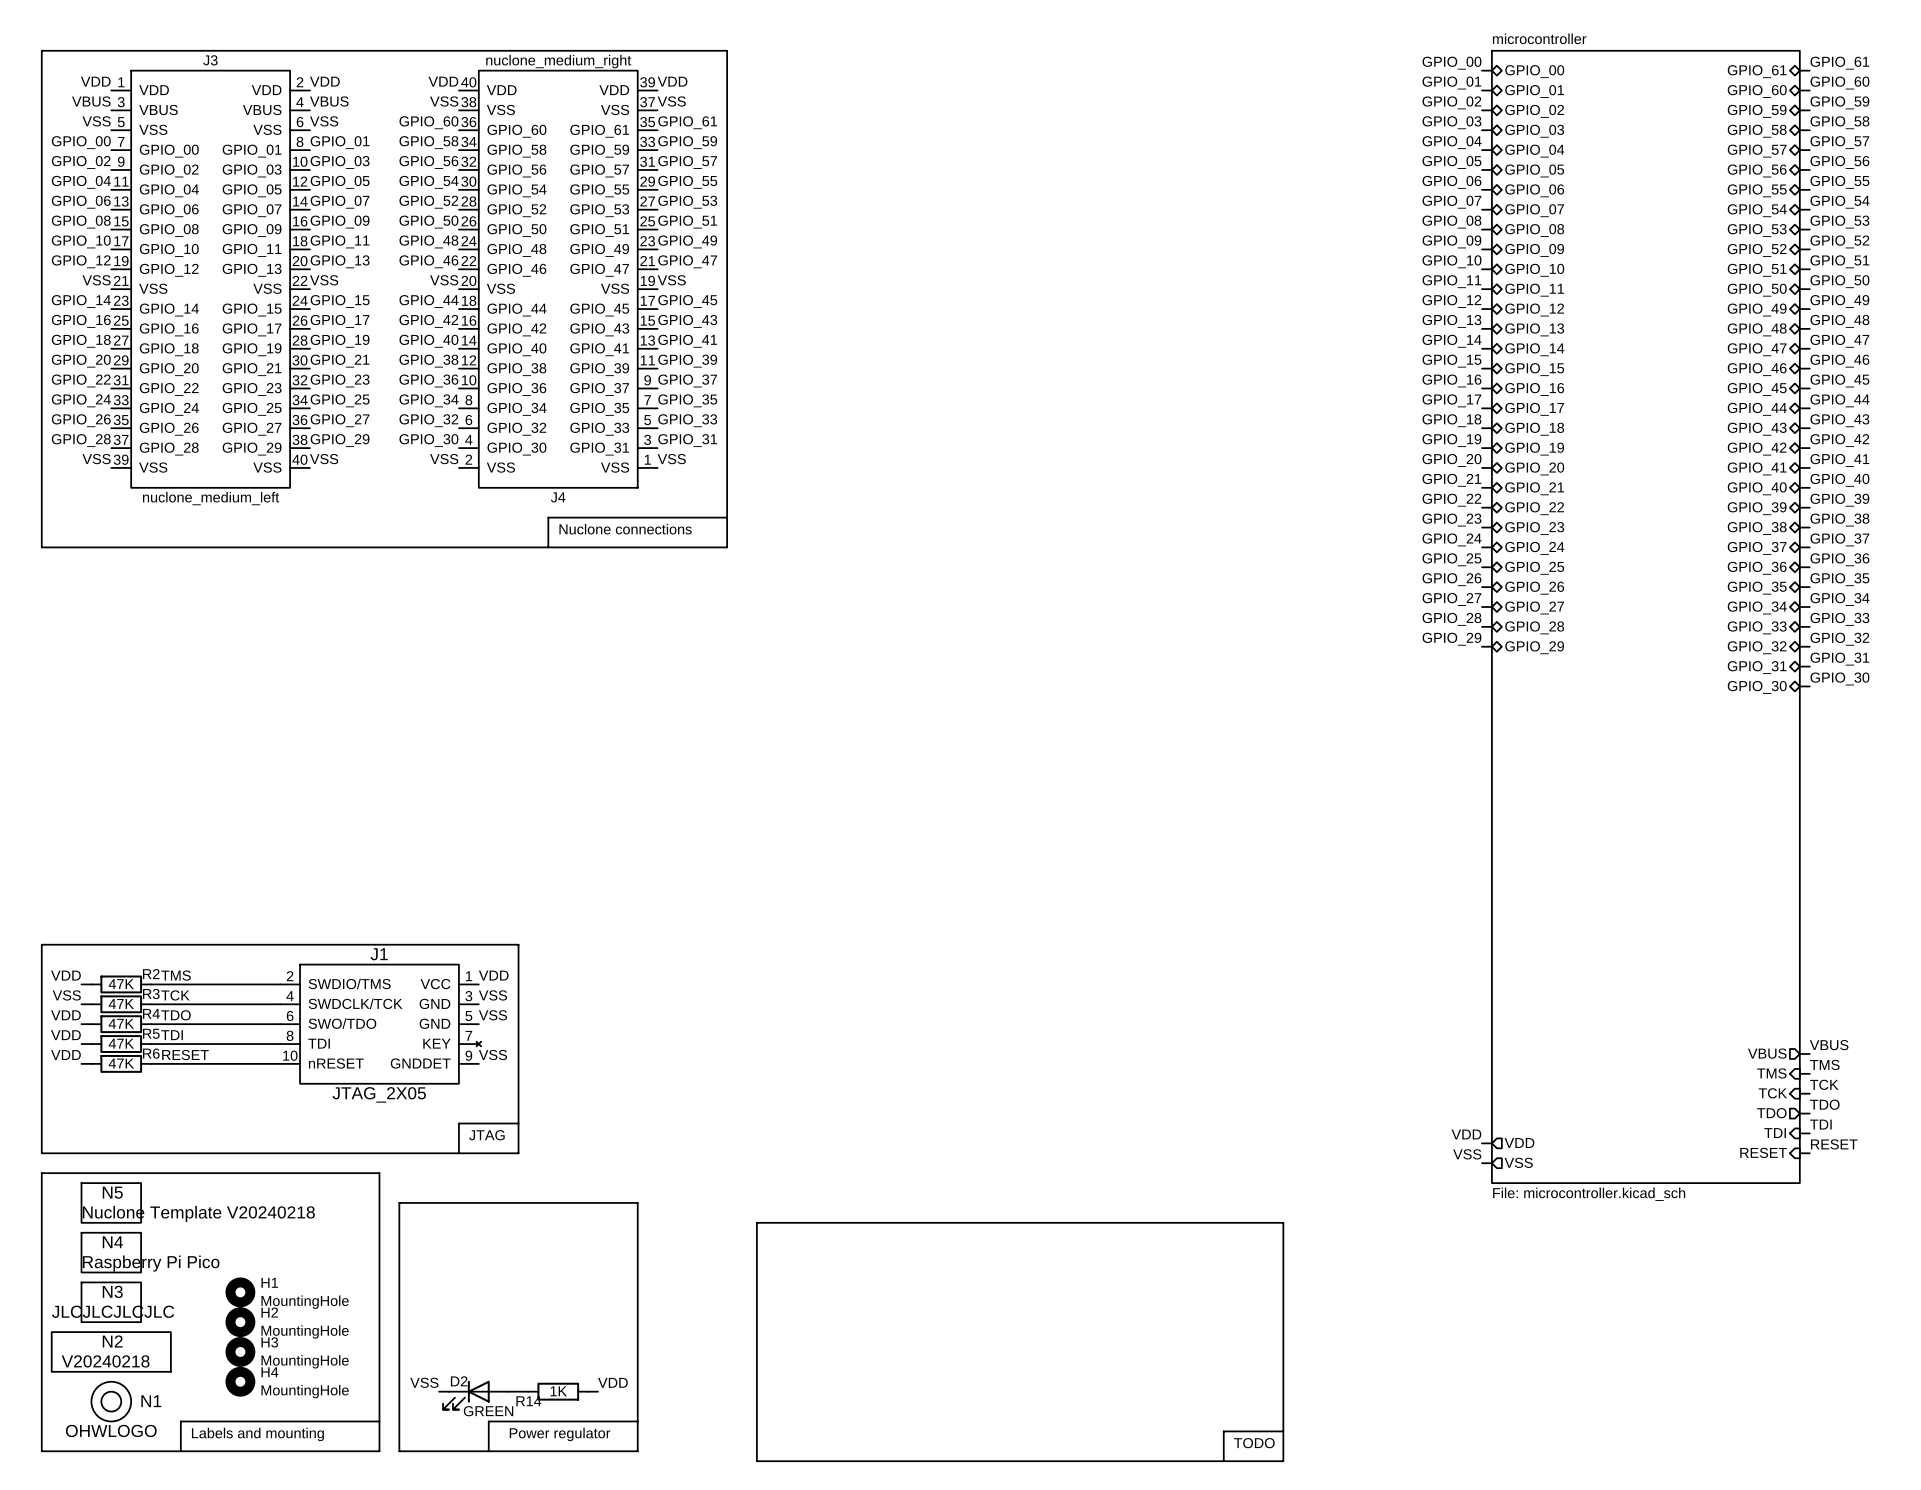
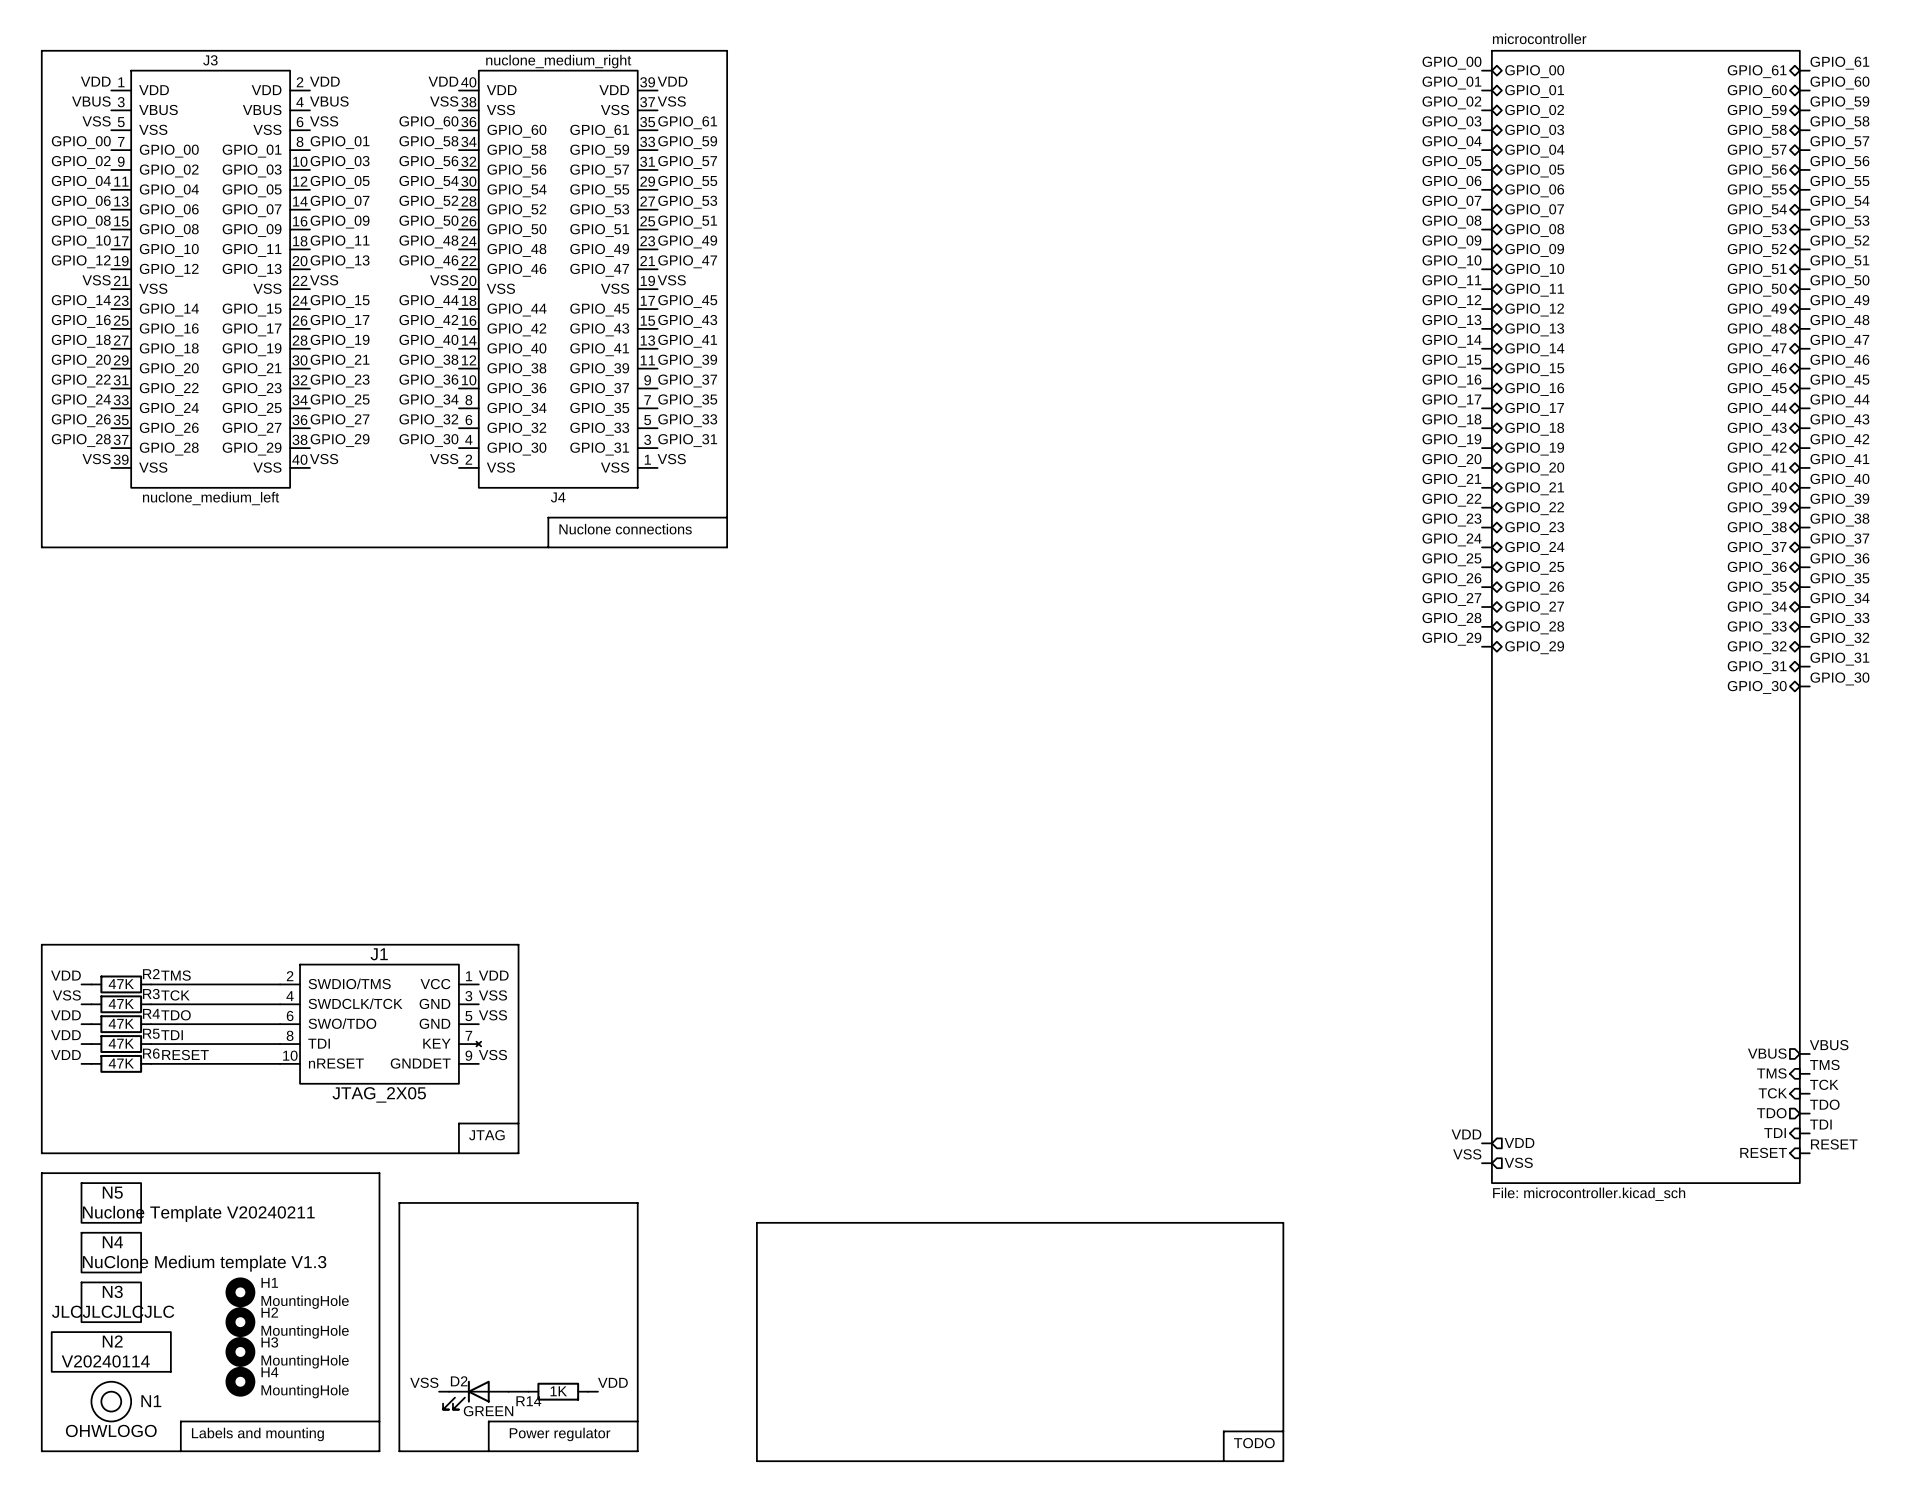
N5 value: Nuclone Template V20240218 (198, 1213) -> Nuclone Template V20240211 (198, 1213)
N4 value: Raspberry Pi Pico (151, 1263) -> NuClone Medium template V1.3 (204, 1263)
N2 value: V20240218 (105, 1361) -> V20240114 (105, 1361)

